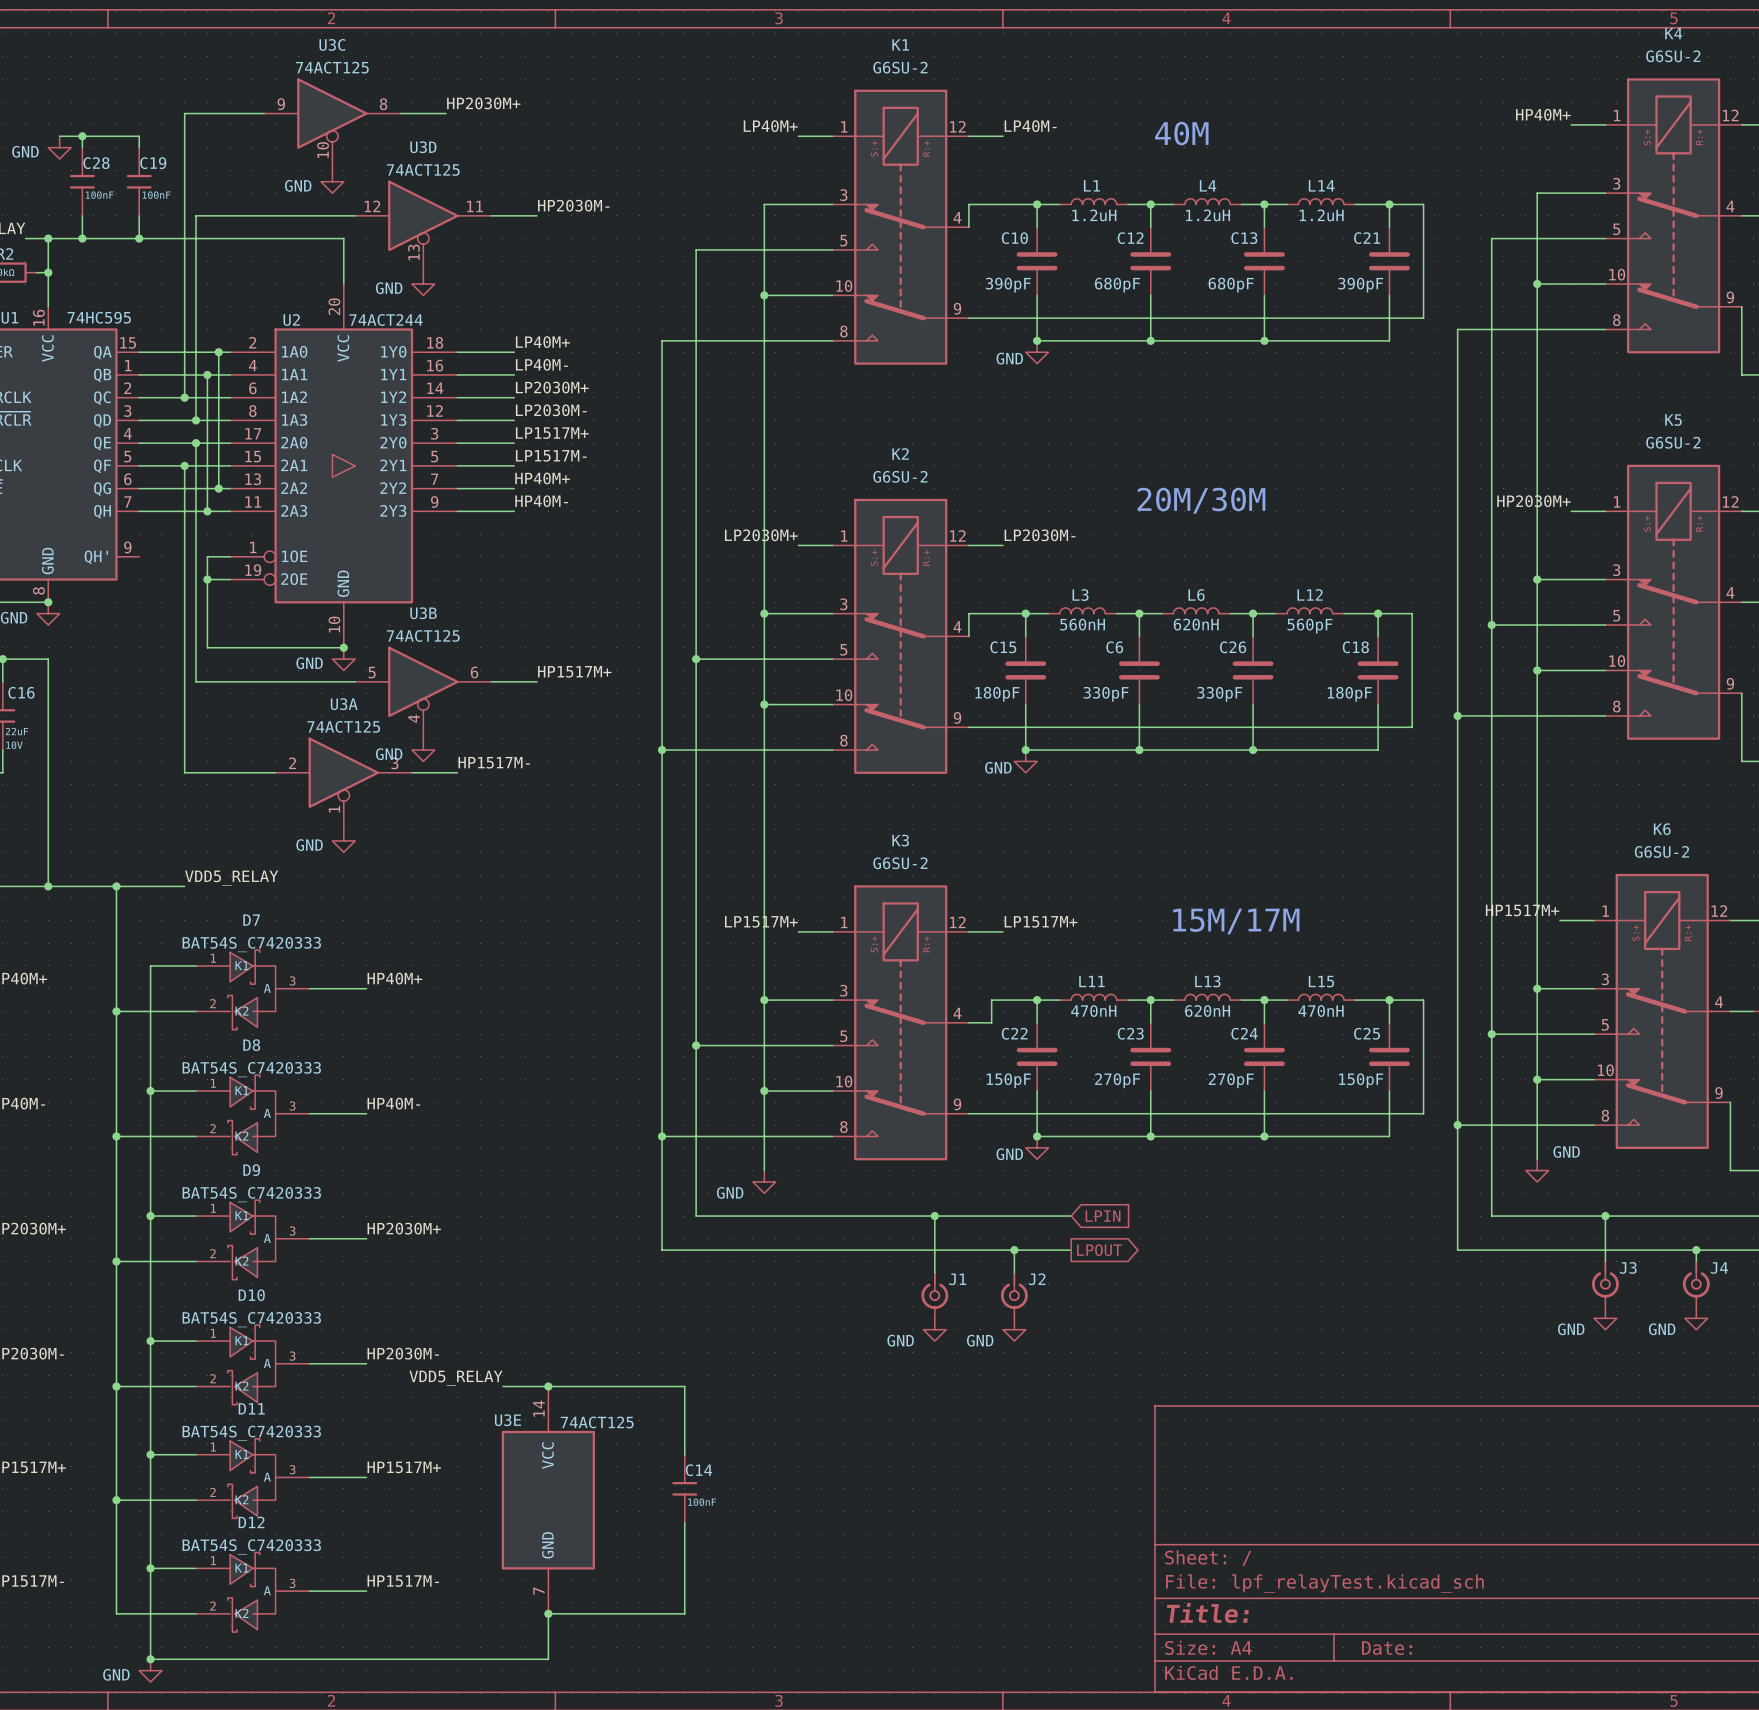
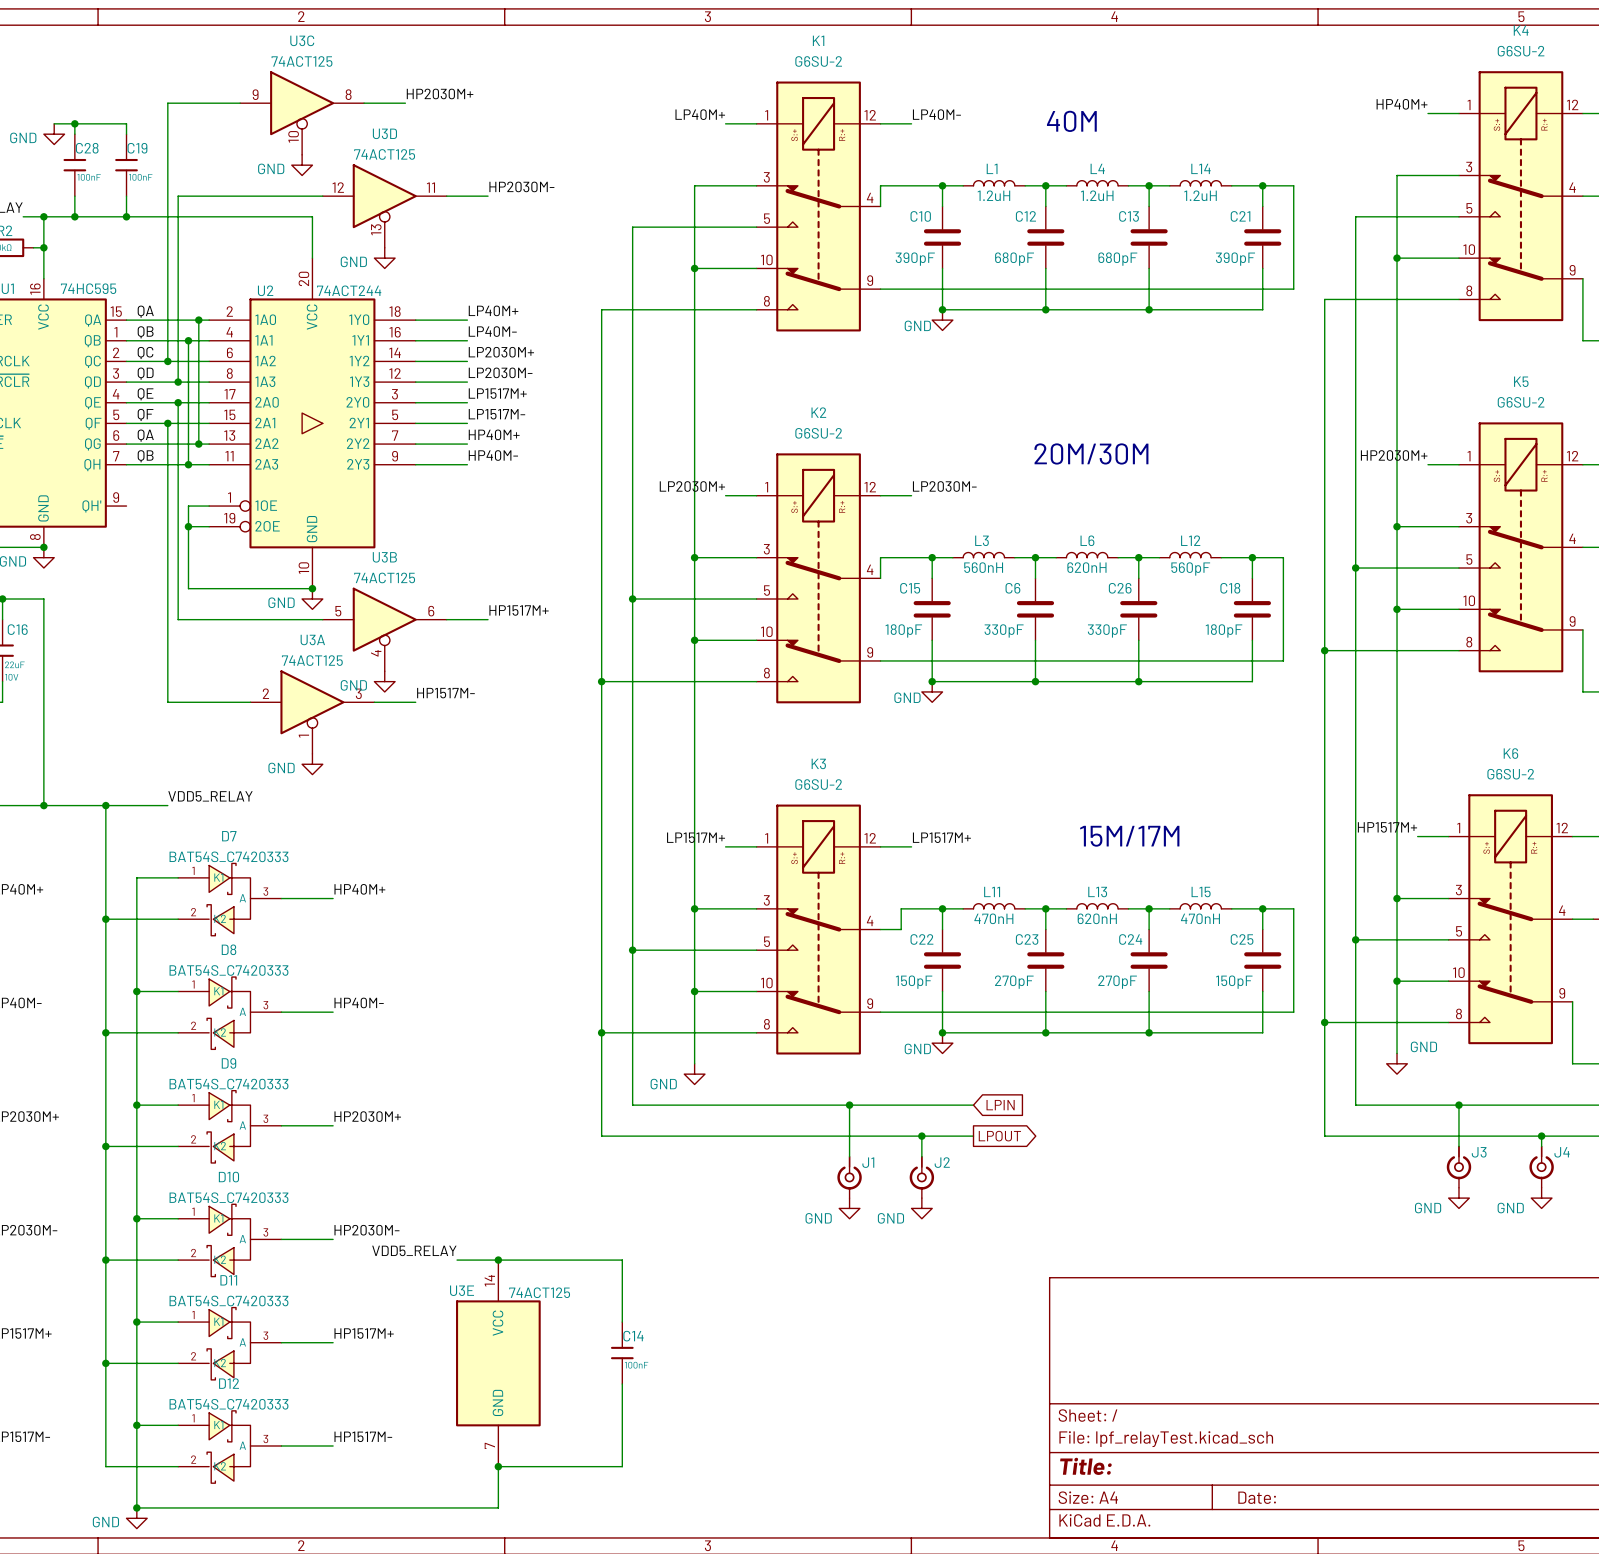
label: none -> QA (145, 311)
label: none -> QB (145, 332)
label: none -> QC (145, 352)
label: none -> QD (145, 373)
label: none -> QE (145, 394)
label: none -> QF (145, 414)
label: none -> QA (145, 435)
label: none -> QB (145, 456)

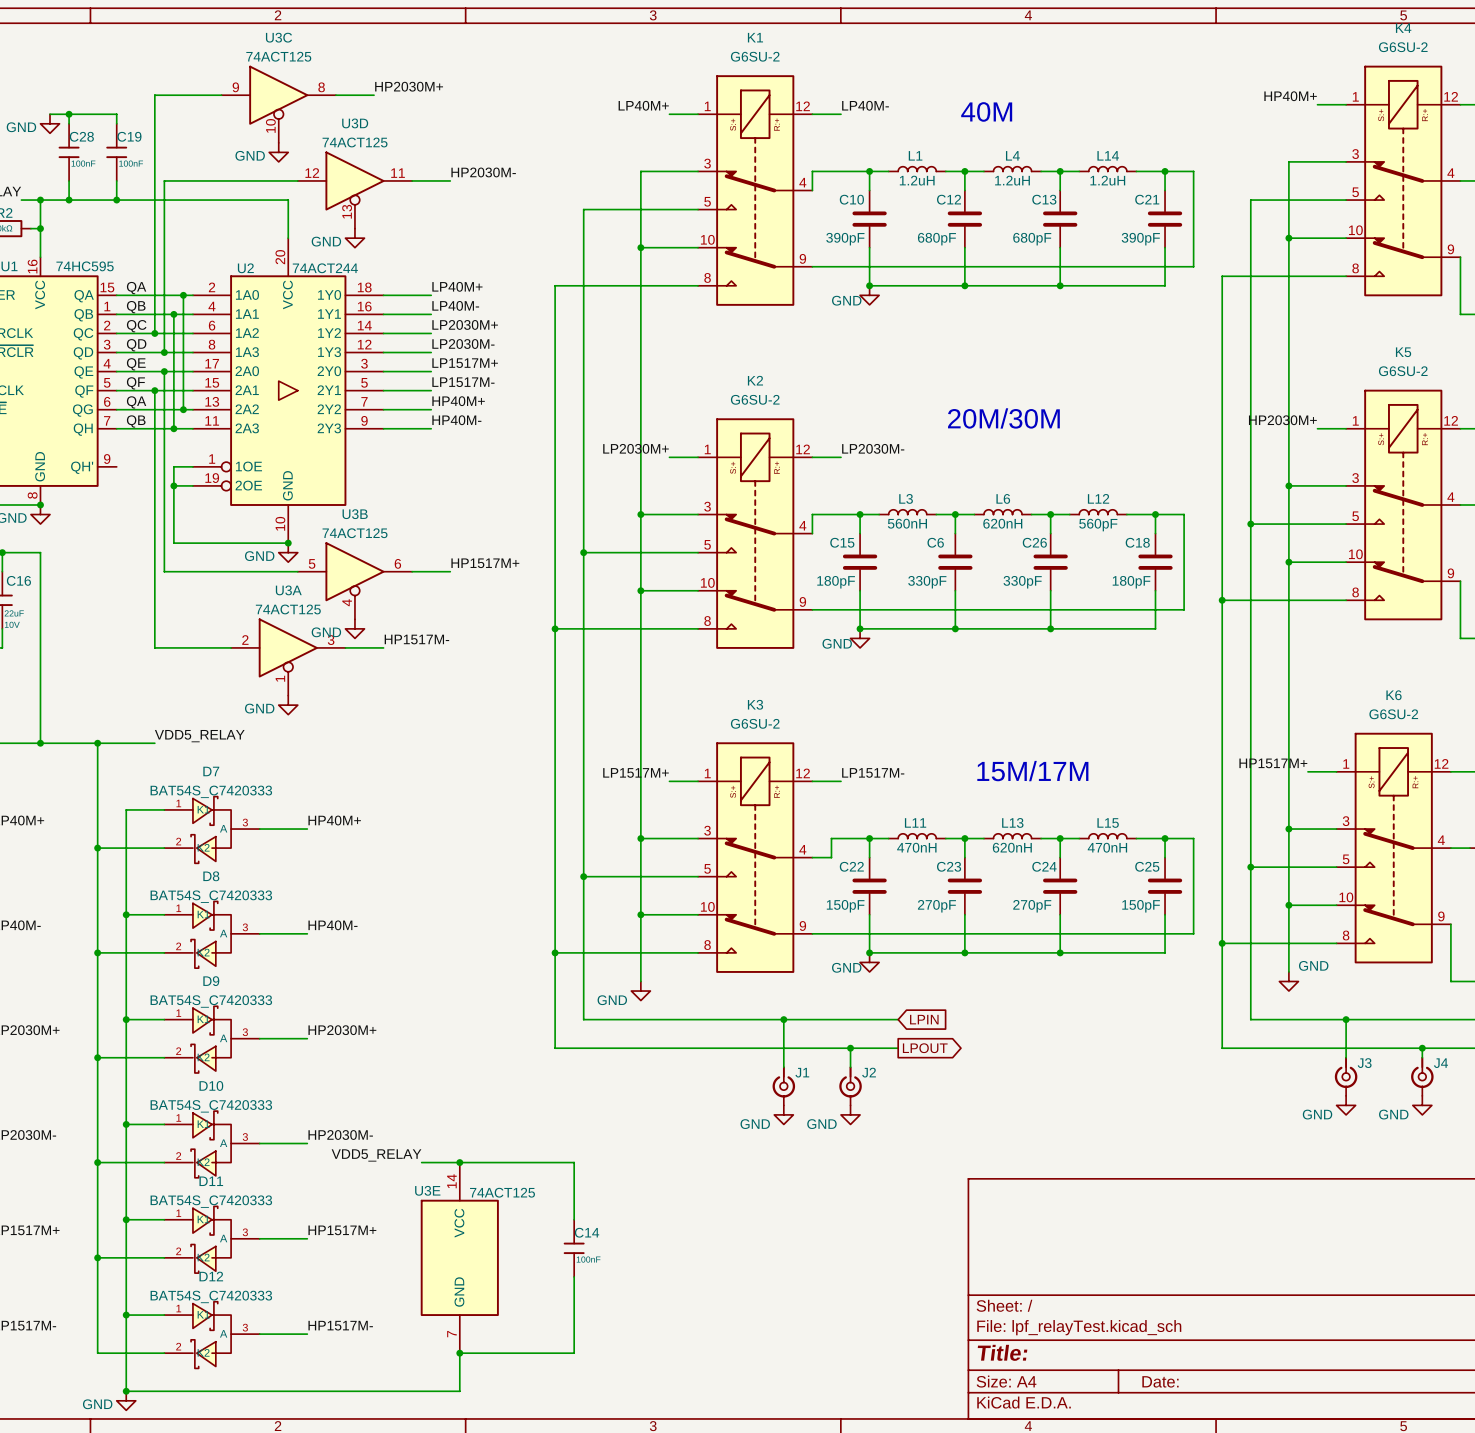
label: LP1517M+ (941, 837) -> LP1517M- (873, 772)

